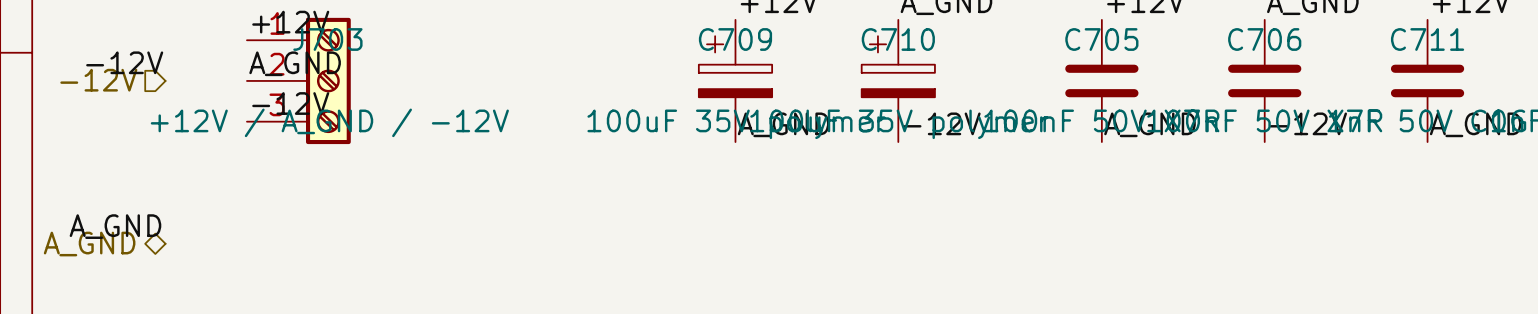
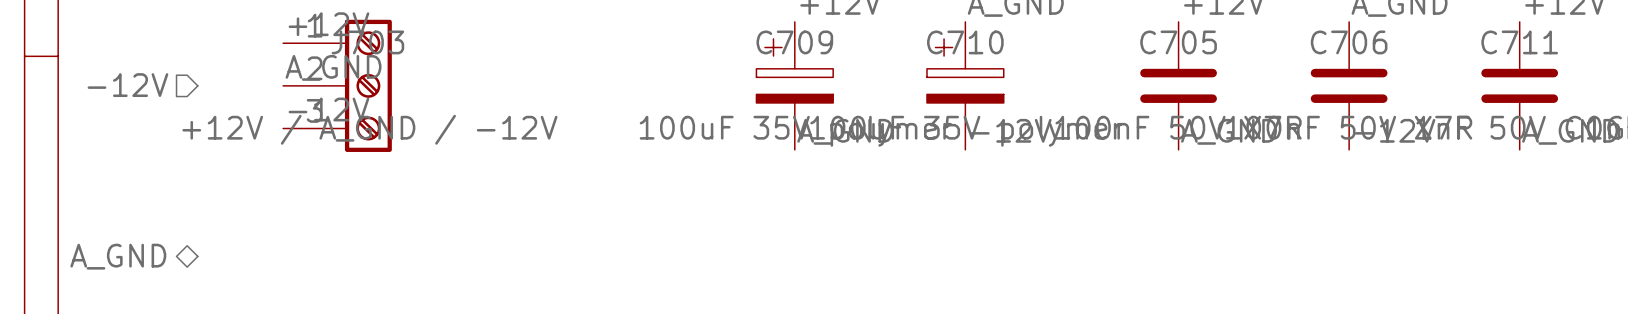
label: -12V (124, 62) -> none
label: A_GND (115, 226) -> none

